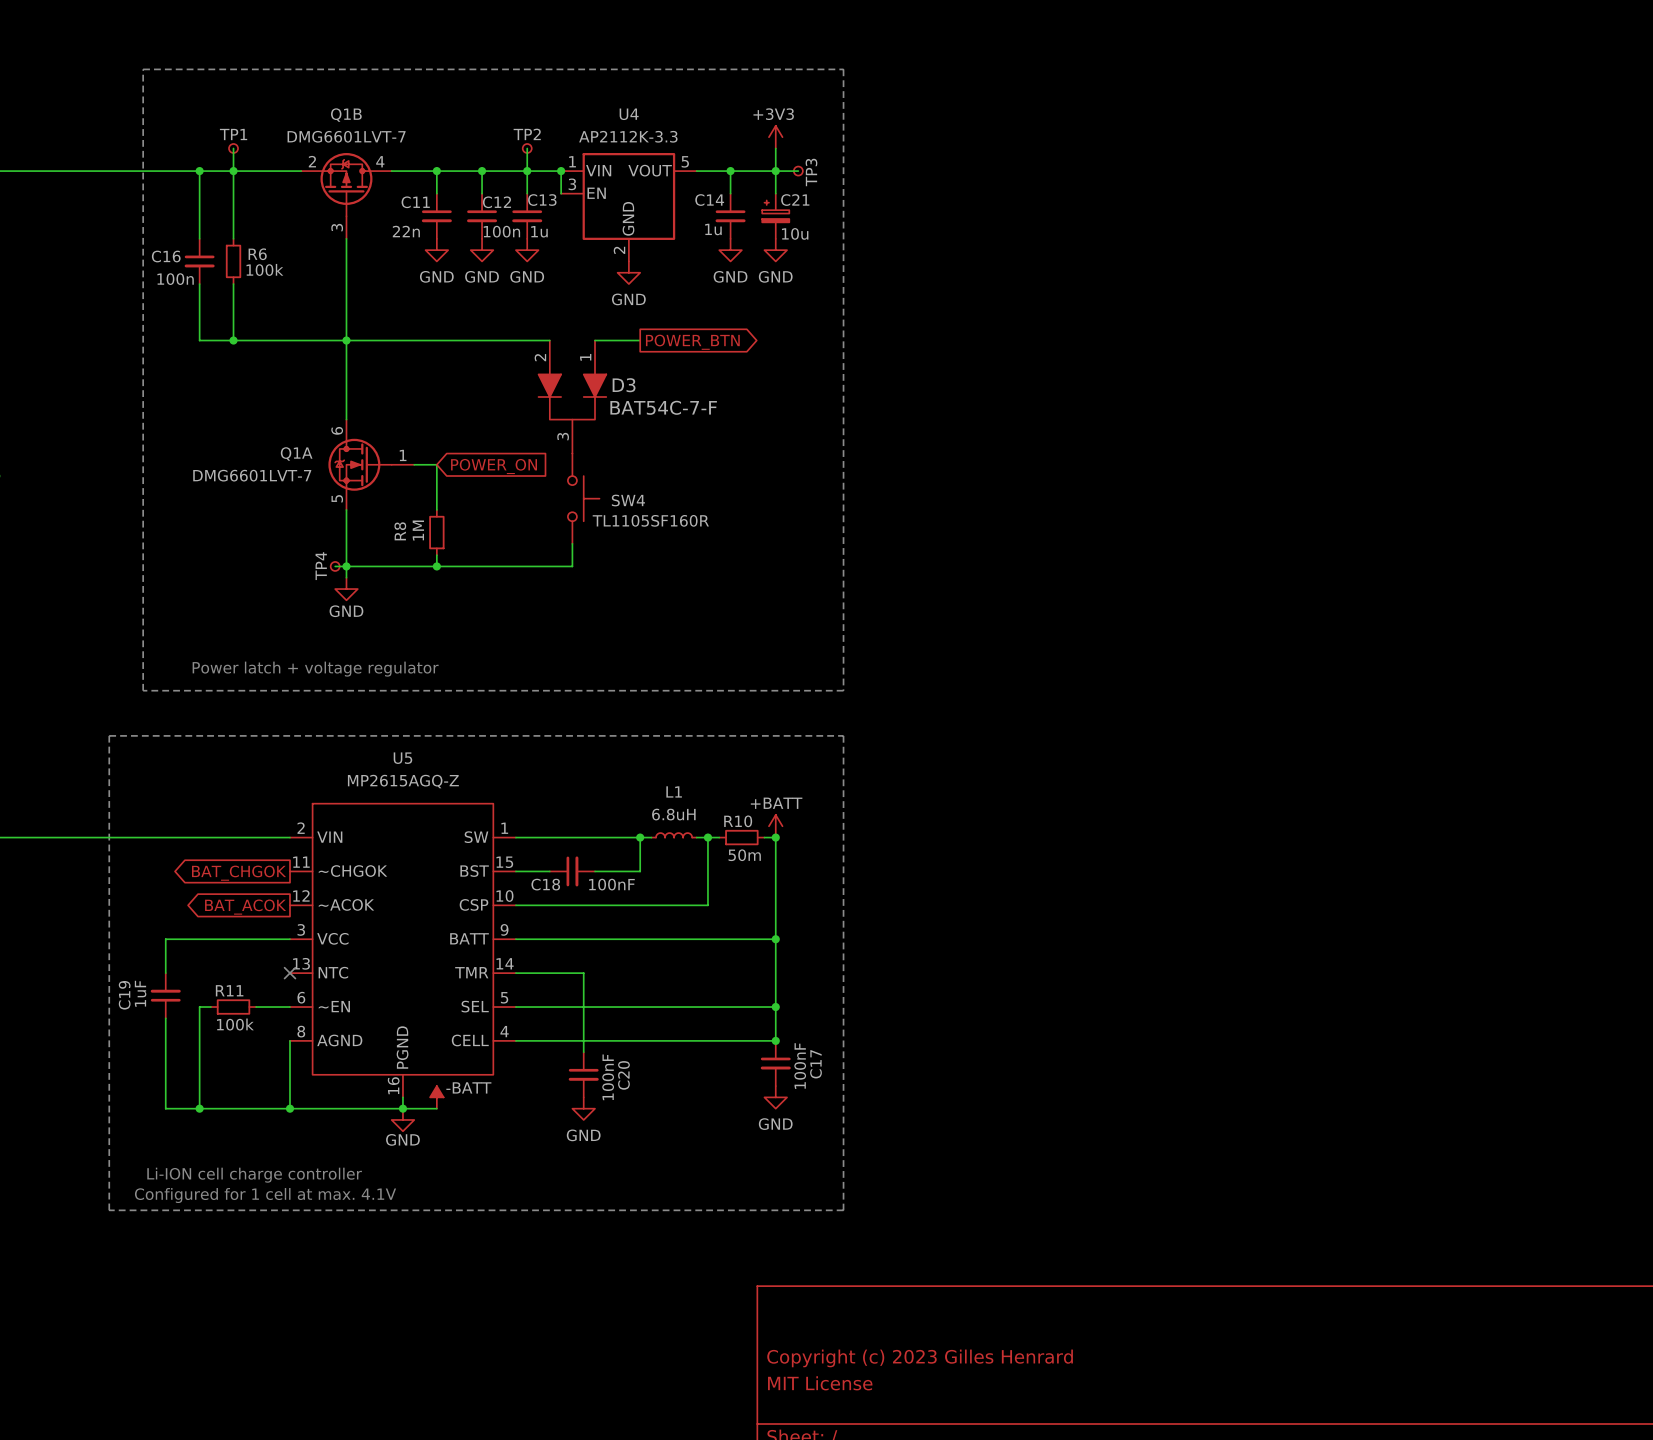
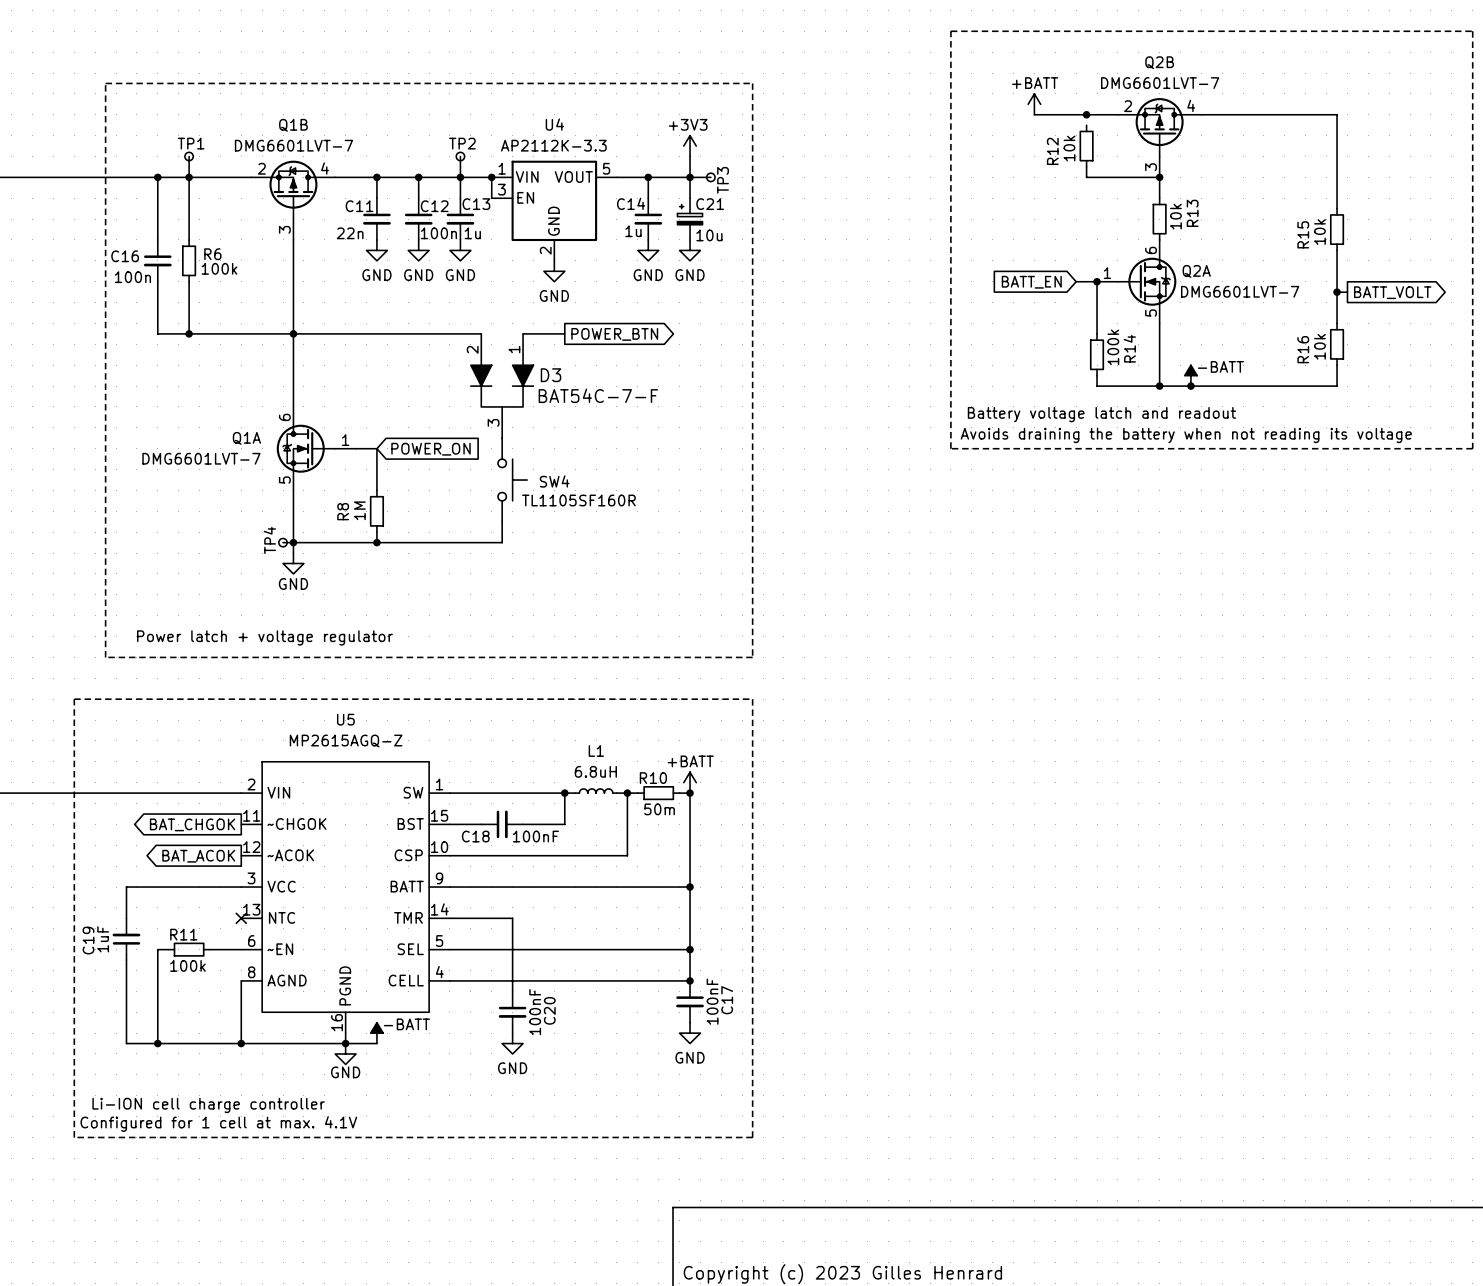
line: none -> (950, 31) (1472, 31) (1472, 448) (950, 448) (950, 31)
power symbol: none -> +BATT (1034, 104)
wire: none -> (1034, 114) (1117, 114)
junction: none -> (1086, 114)
wire: none -> (1201, 114) (1337, 114) (1337, 208)
Q2B: none -> DMG6601LVT-7 (1159, 137)
R12: none -> 10k (1086, 146)
wire: none -> (1086, 166) (1086, 177) (1159, 177) (1159, 198)
junction: none -> (1159, 177)
R13: none -> 10k (1159, 219)
R15: none -> 10k (1337, 229)
wire: none -> (1337, 250) (1337, 323)
wire: none -> (1076, 281) (1097, 281) (1097, 333)
junction: none -> (1097, 281)
Q2A: none -> DMG6601LVT-7 (1136, 281)
global label: none -> BATT_EN (1031, 282)
wire: none -> (1337, 292) (1347, 292)
junction: none -> (1337, 292)
global label: none -> BATT_VOLT (1392, 292)
wire: none -> (1159, 323) (1159, 386)
R16: none -> 10k (1337, 344)
R14: none -> 100k (1097, 354)
wire: none -> (1337, 365) (1337, 386) (1097, 386) (1097, 375)
power symbol: none -> -BATT (1190, 375)
junction: none -> (1159, 386)
junction: none -> (1190, 386)
text: none -> Battery voltage latch and readout (1101, 414)
text: none -> Avoids draining the battery when not reading its voltage (1186, 435)

